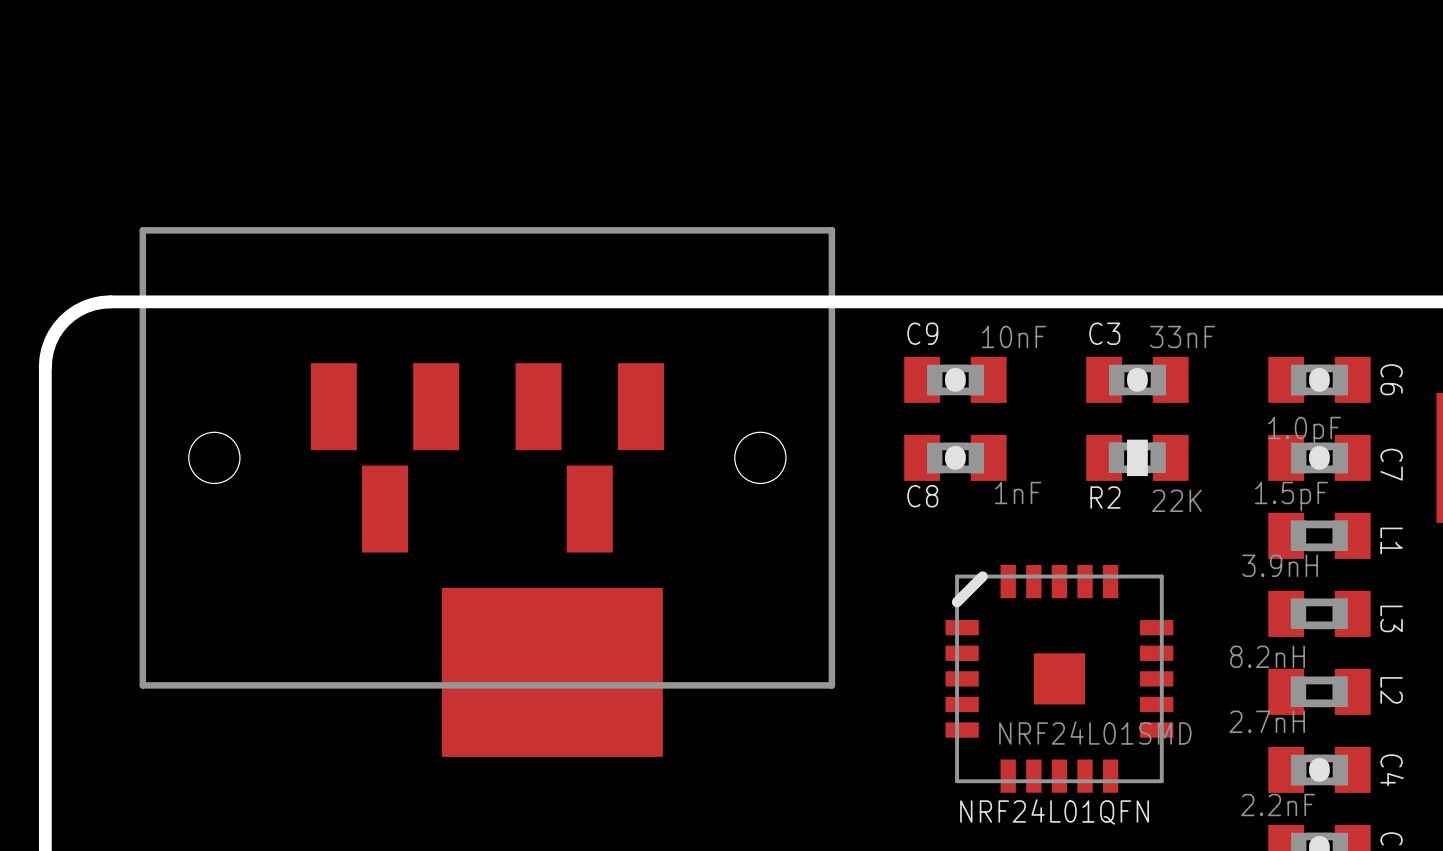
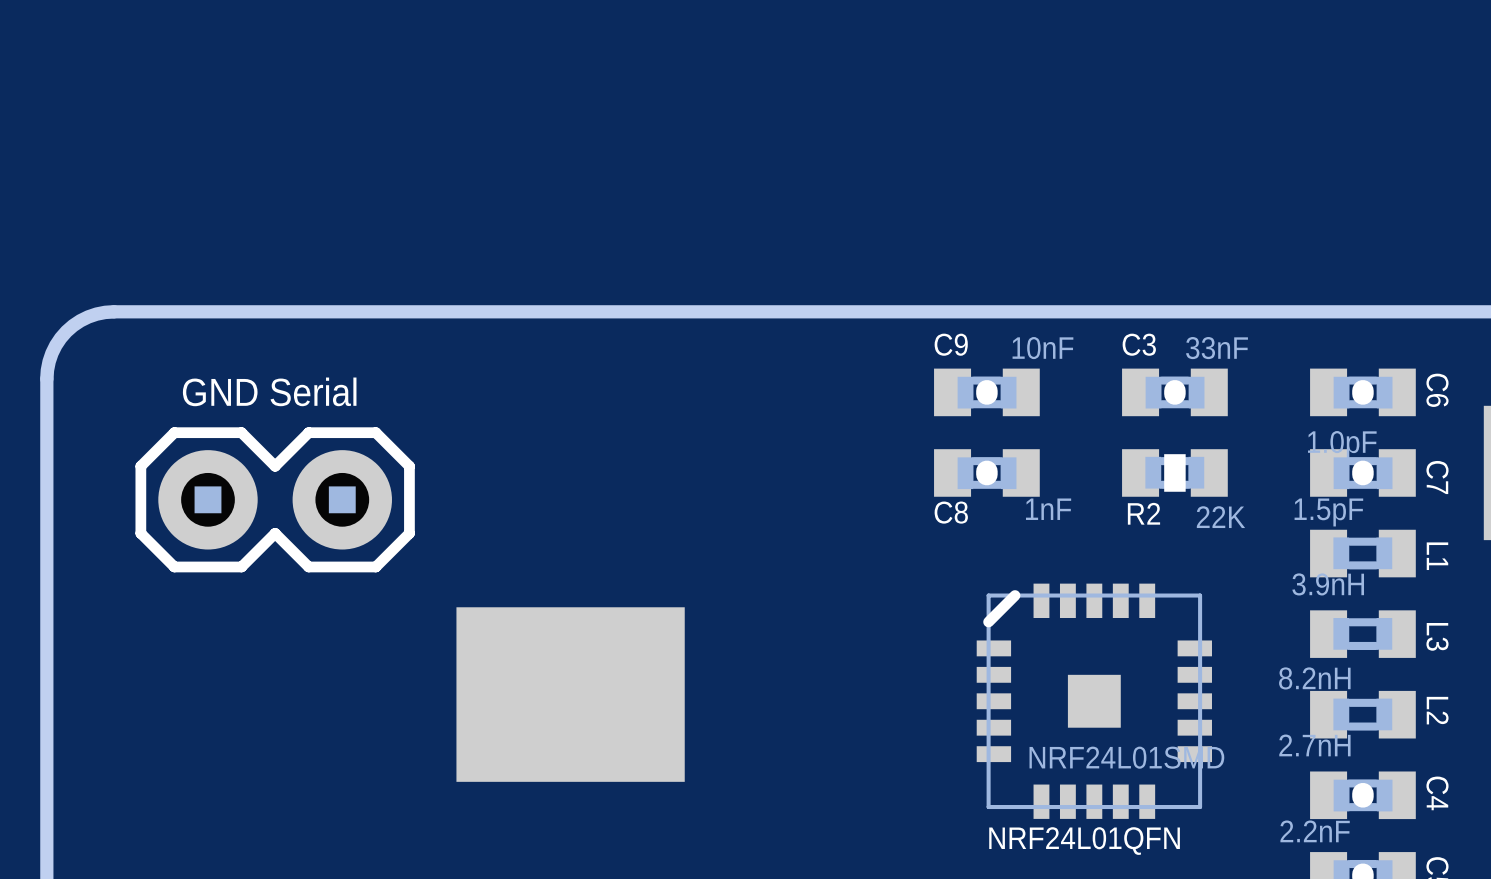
text: none -> GND Serial (269, 391)
part: (487, 457) -> none
part: none -> (275, 499)

